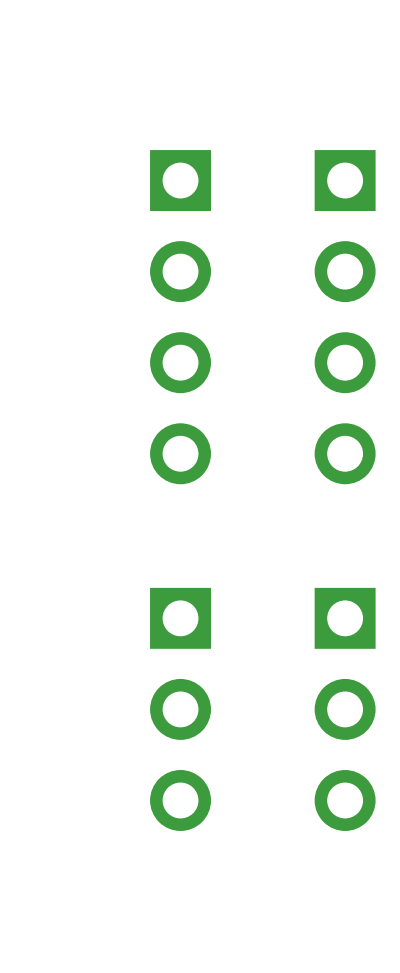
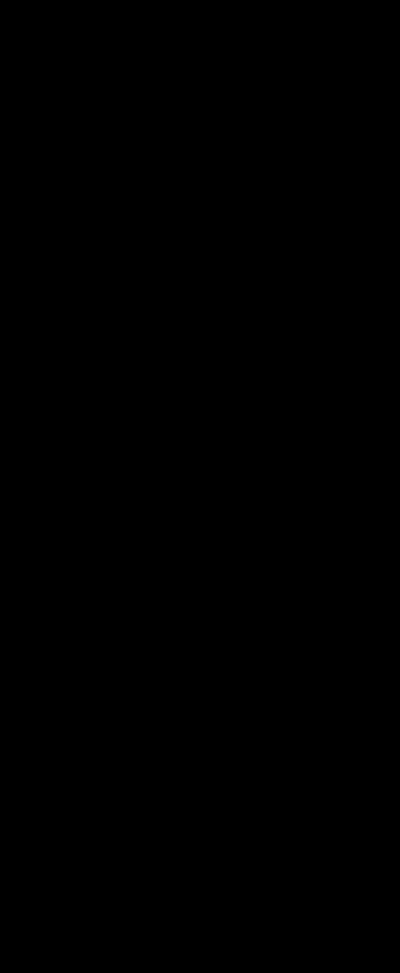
part: (180, 317) -> none
part: (345, 317) -> none
part: (180, 709) -> none
part: (345, 709) -> none

